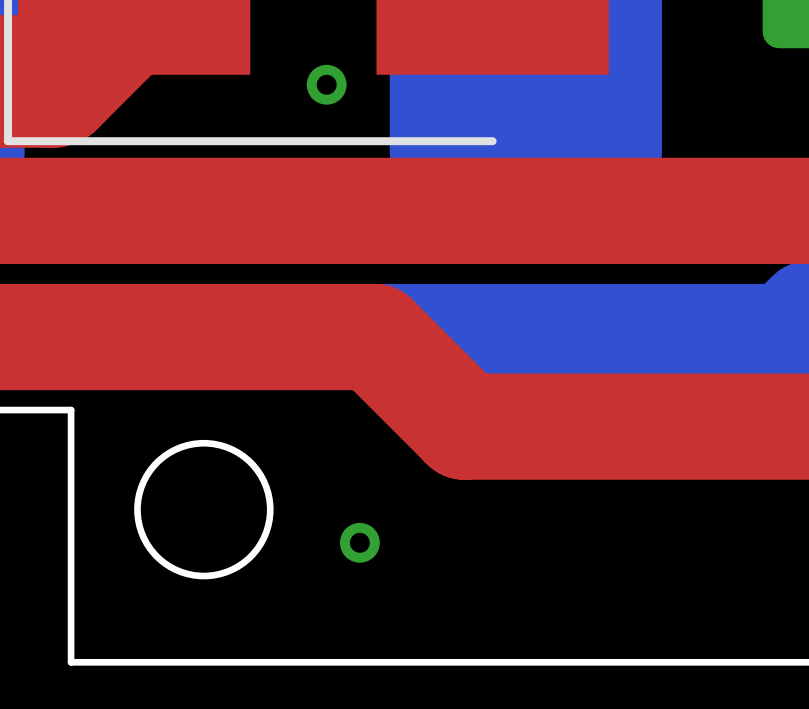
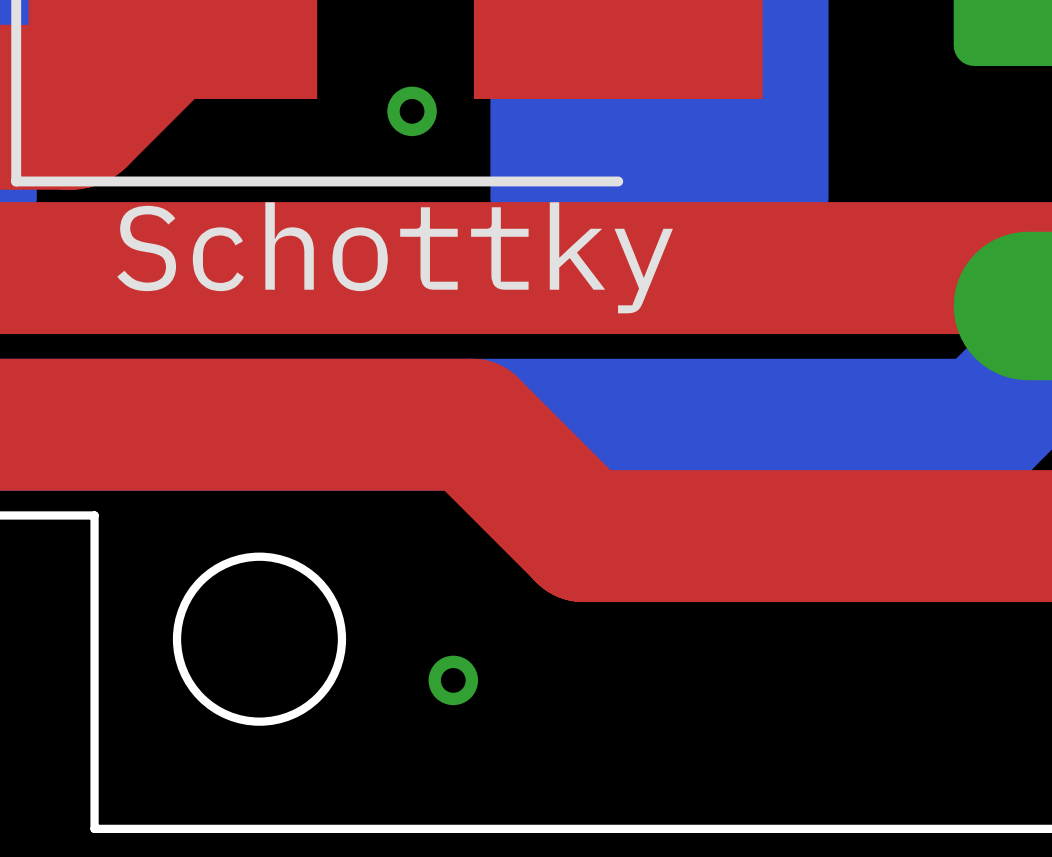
part value: none -> Schottky (395, 257)

